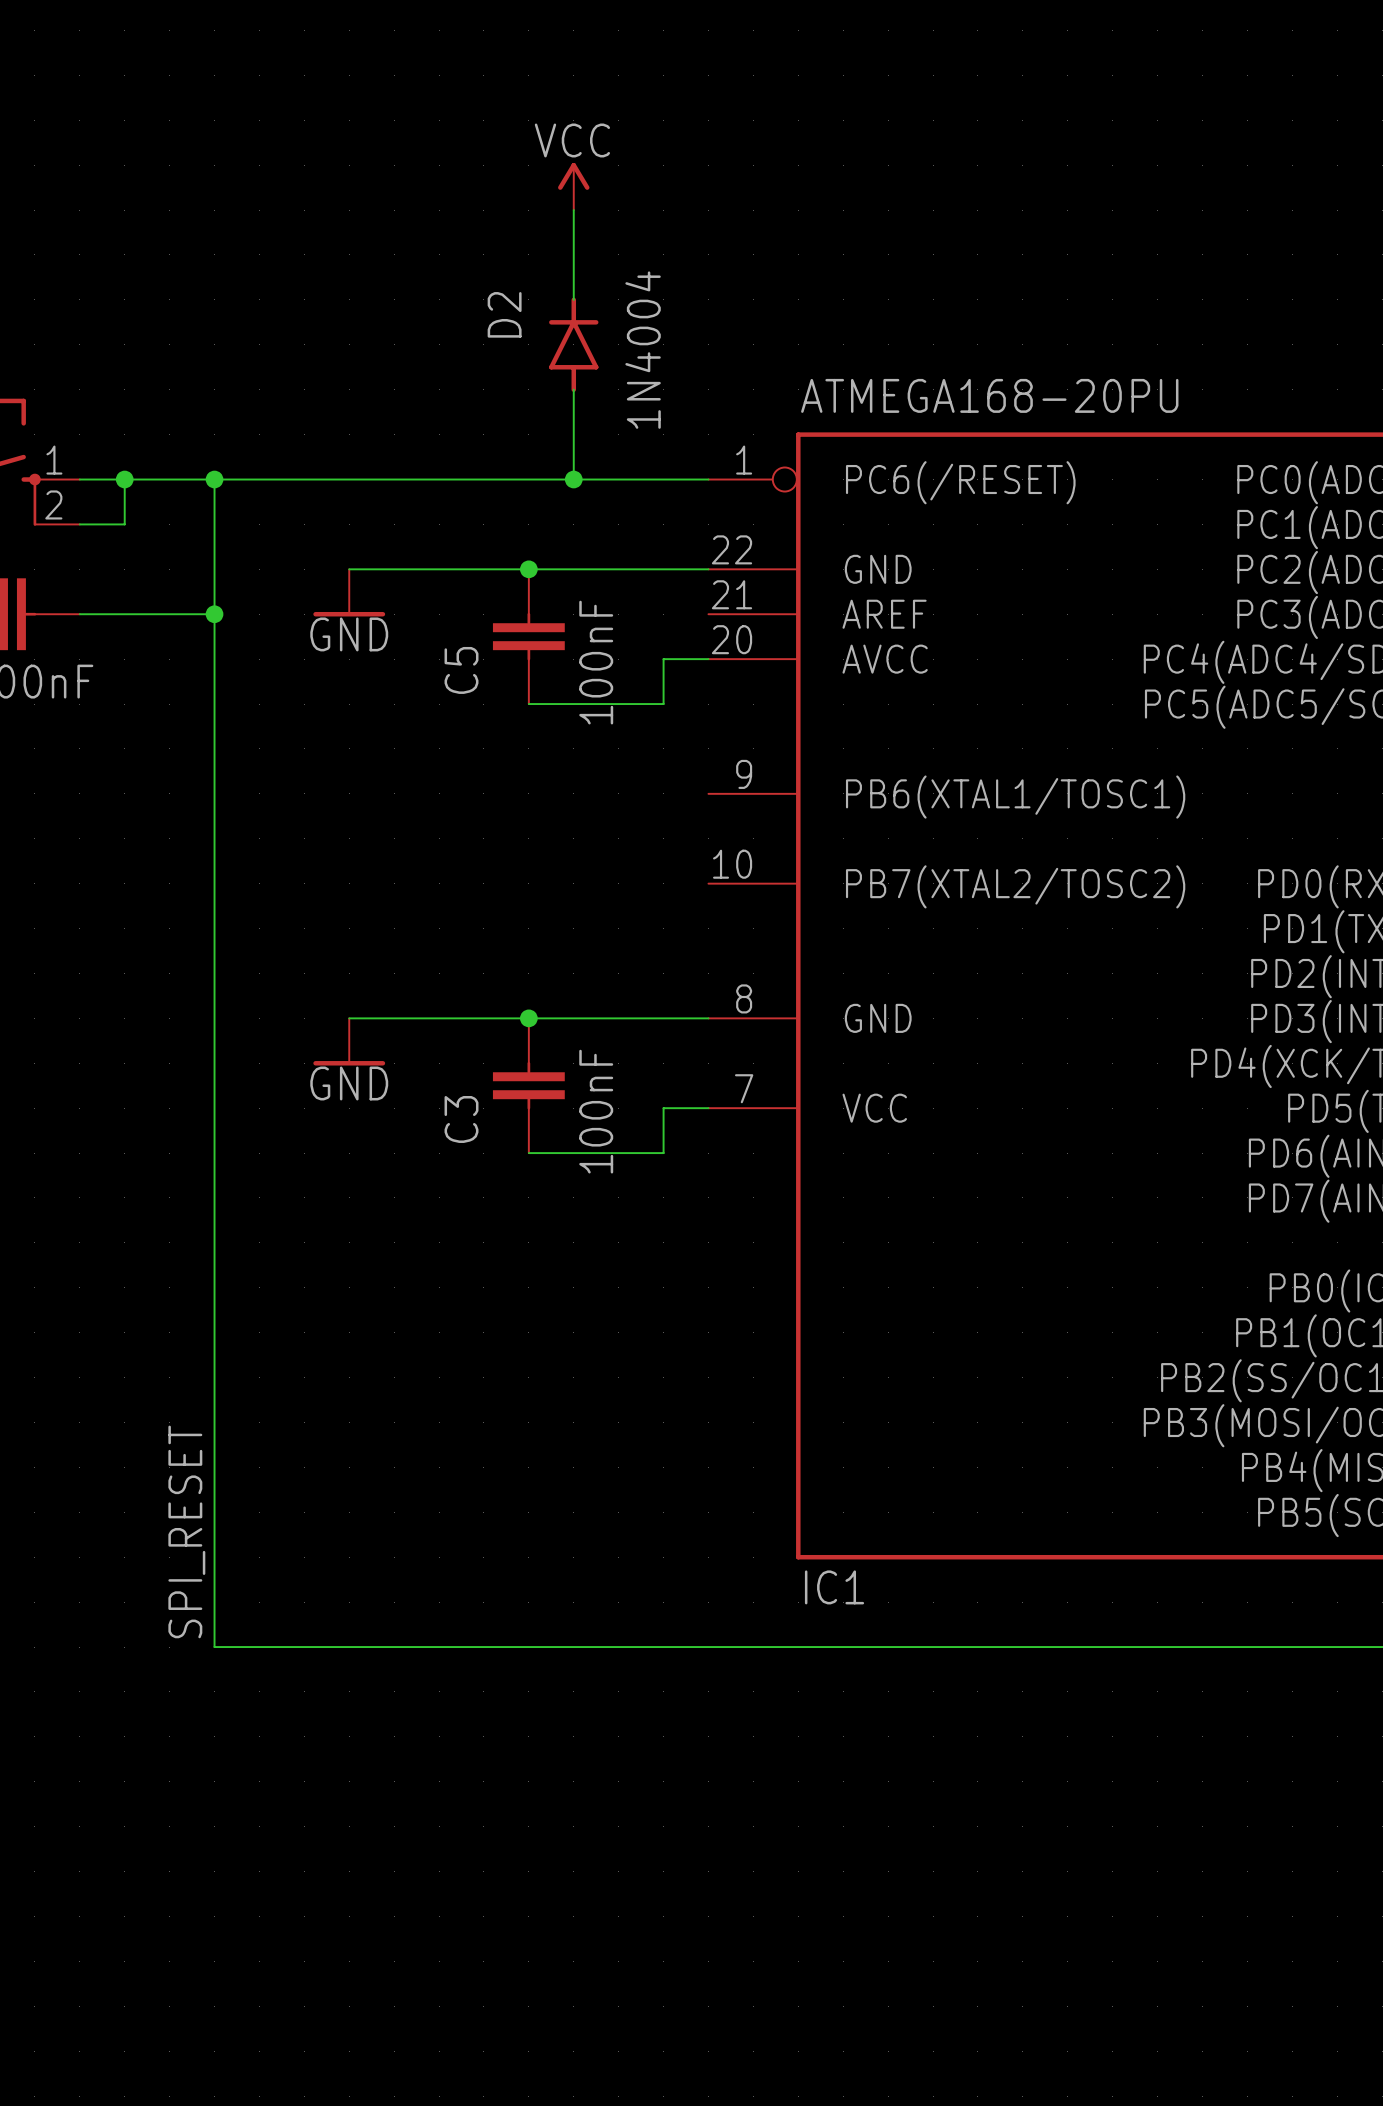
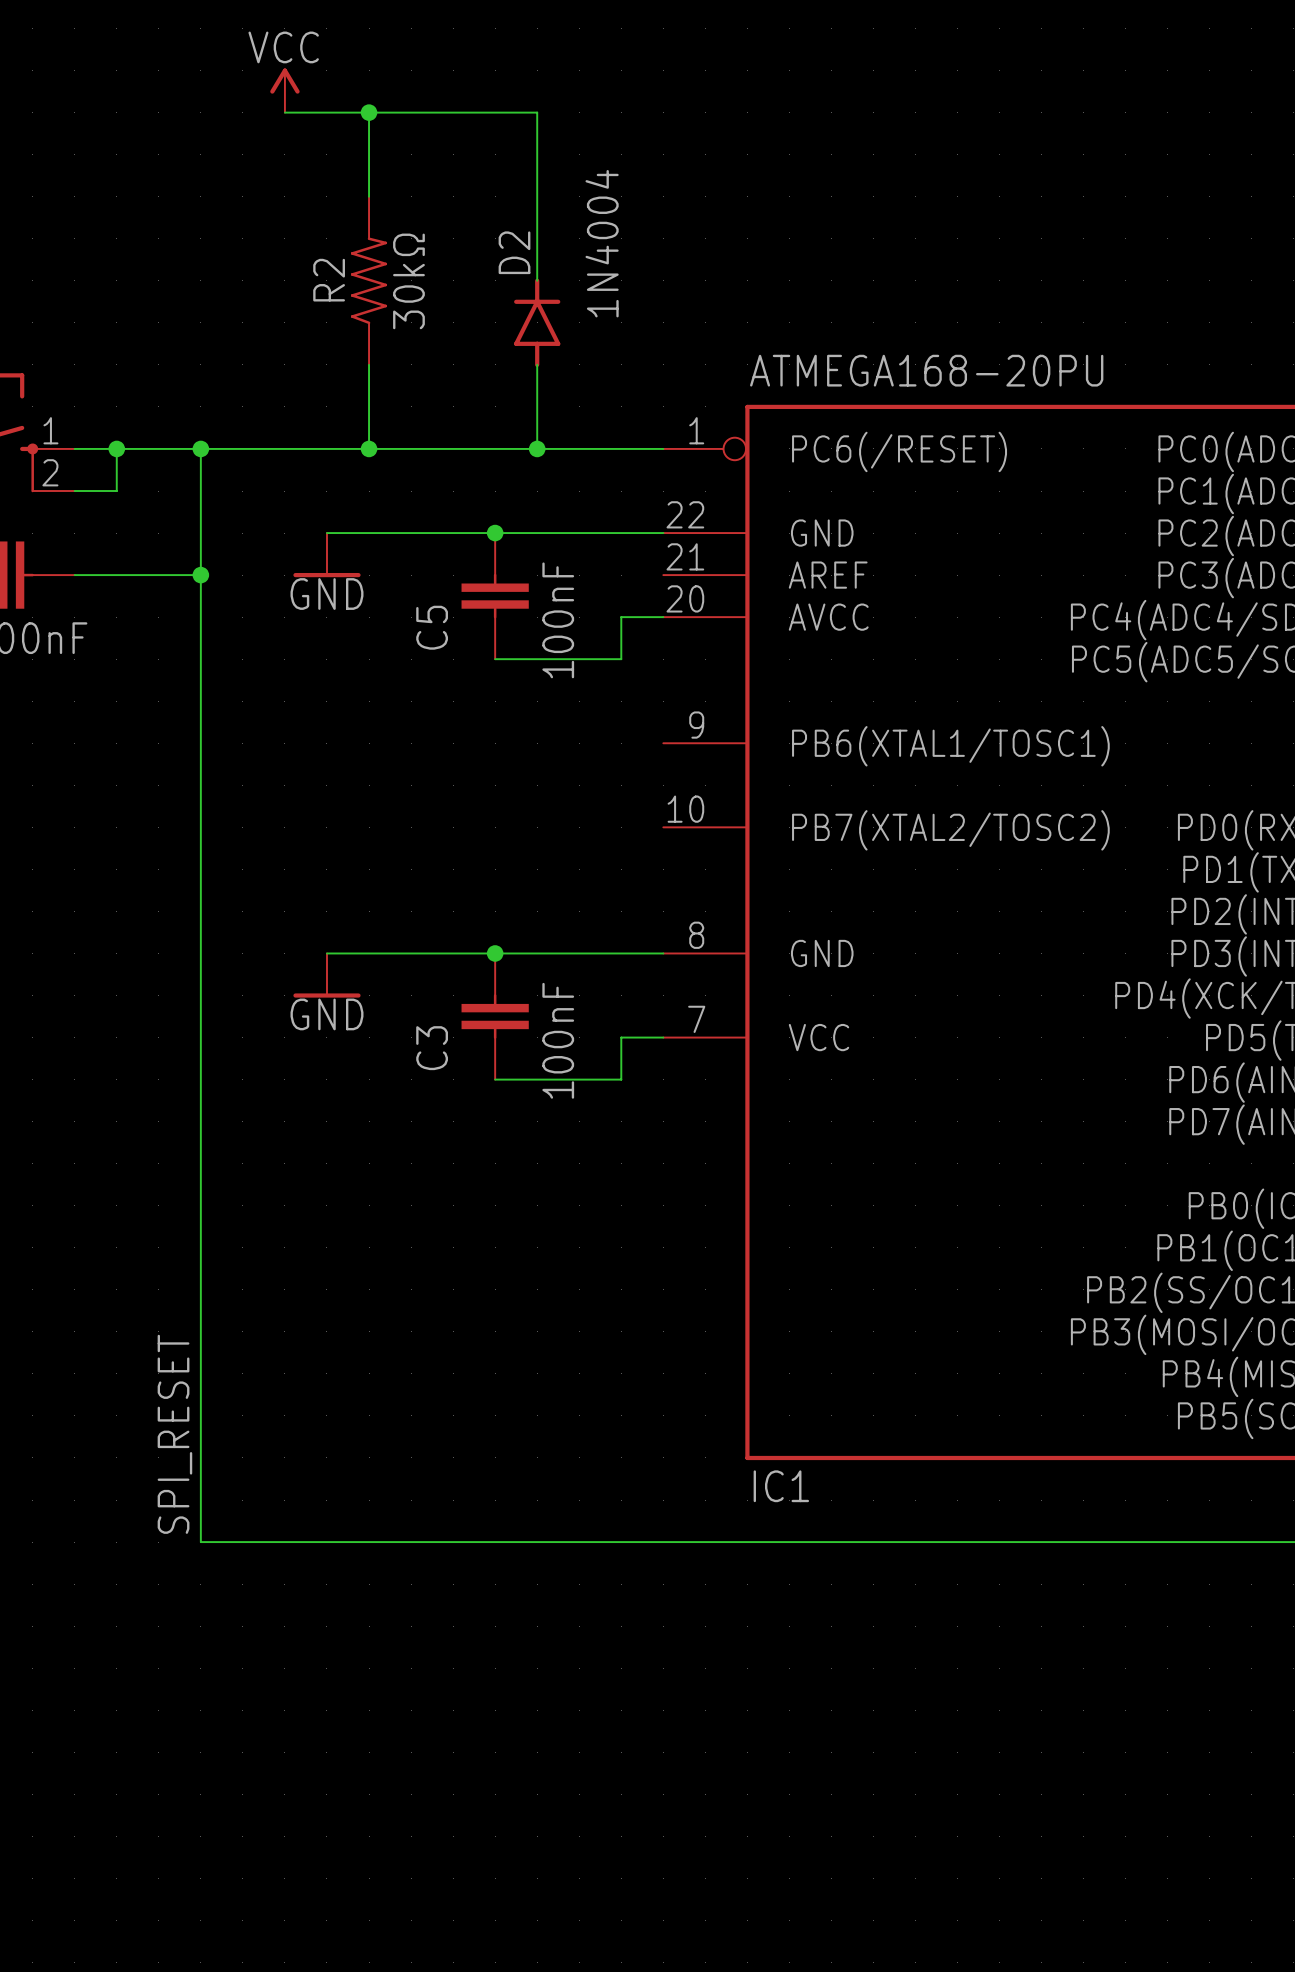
wire: none -> (284, 112) (537, 112) (537, 196)
wire: none -> (369, 112) (369, 196)
junction: none -> (369, 112)
power symbol position: VCC (573, 186) -> VCC (284, 90)
R2: none -> 30kΩ (369, 280)
D2 name position: D2 (504, 314) -> D2 (514, 252)
D2 value position: 1N4004 (643, 350) -> 1N4004 (602, 243)
wire: none -> (369, 364) (369, 448)
junction: none -> (369, 448)

